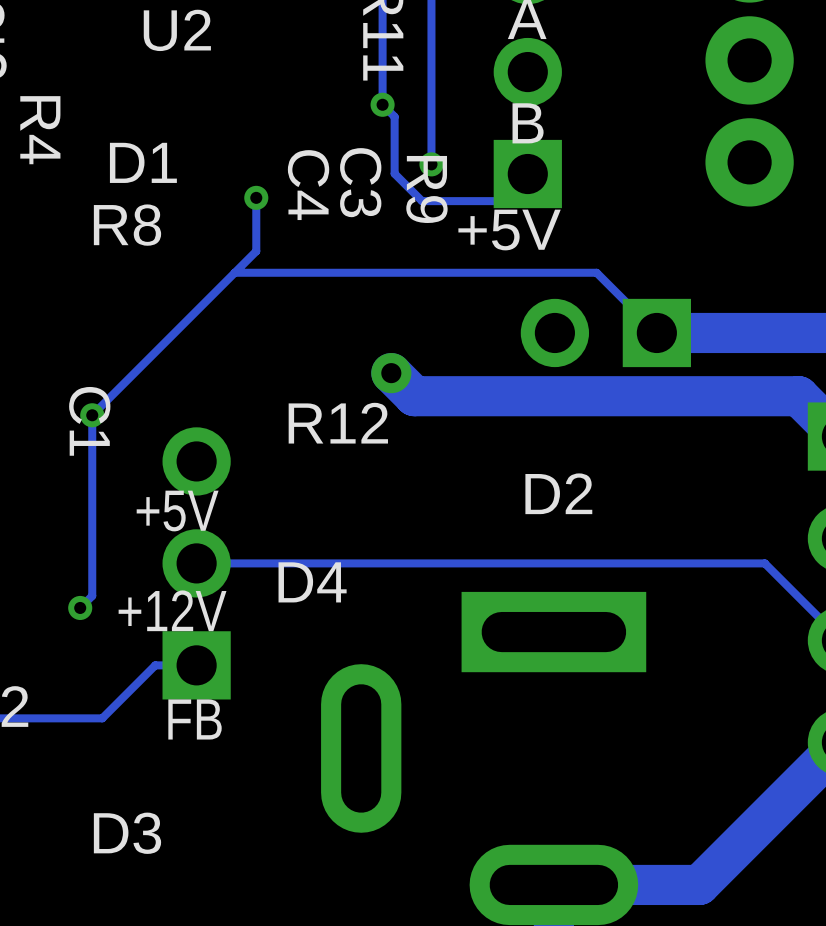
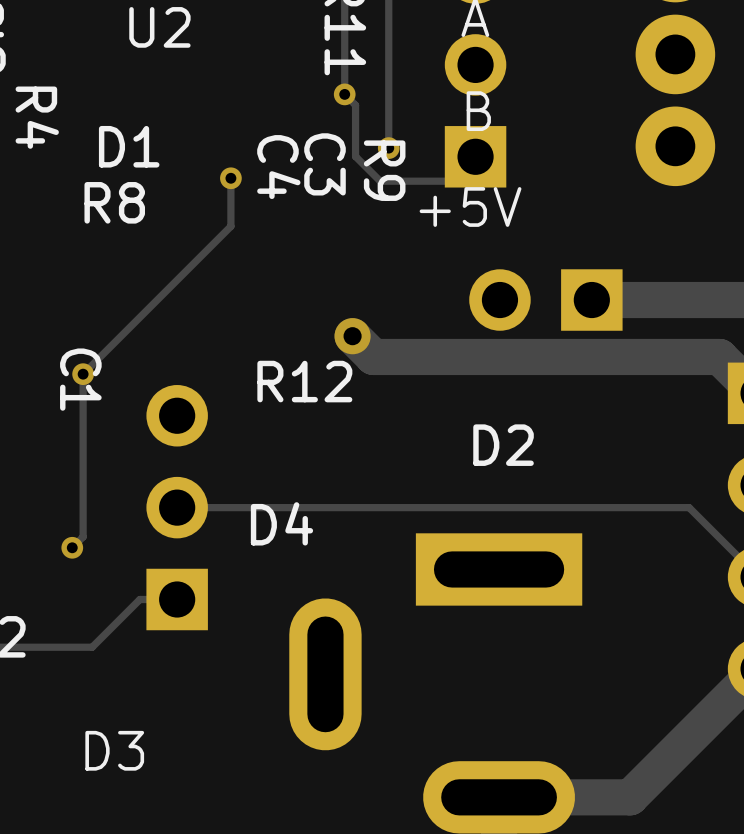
track: (234, 272) (596, 272) (656, 332) -> none
text: +5V (177, 511) -> none
text: +12V (172, 610) -> none
text: FB (195, 719) -> none

